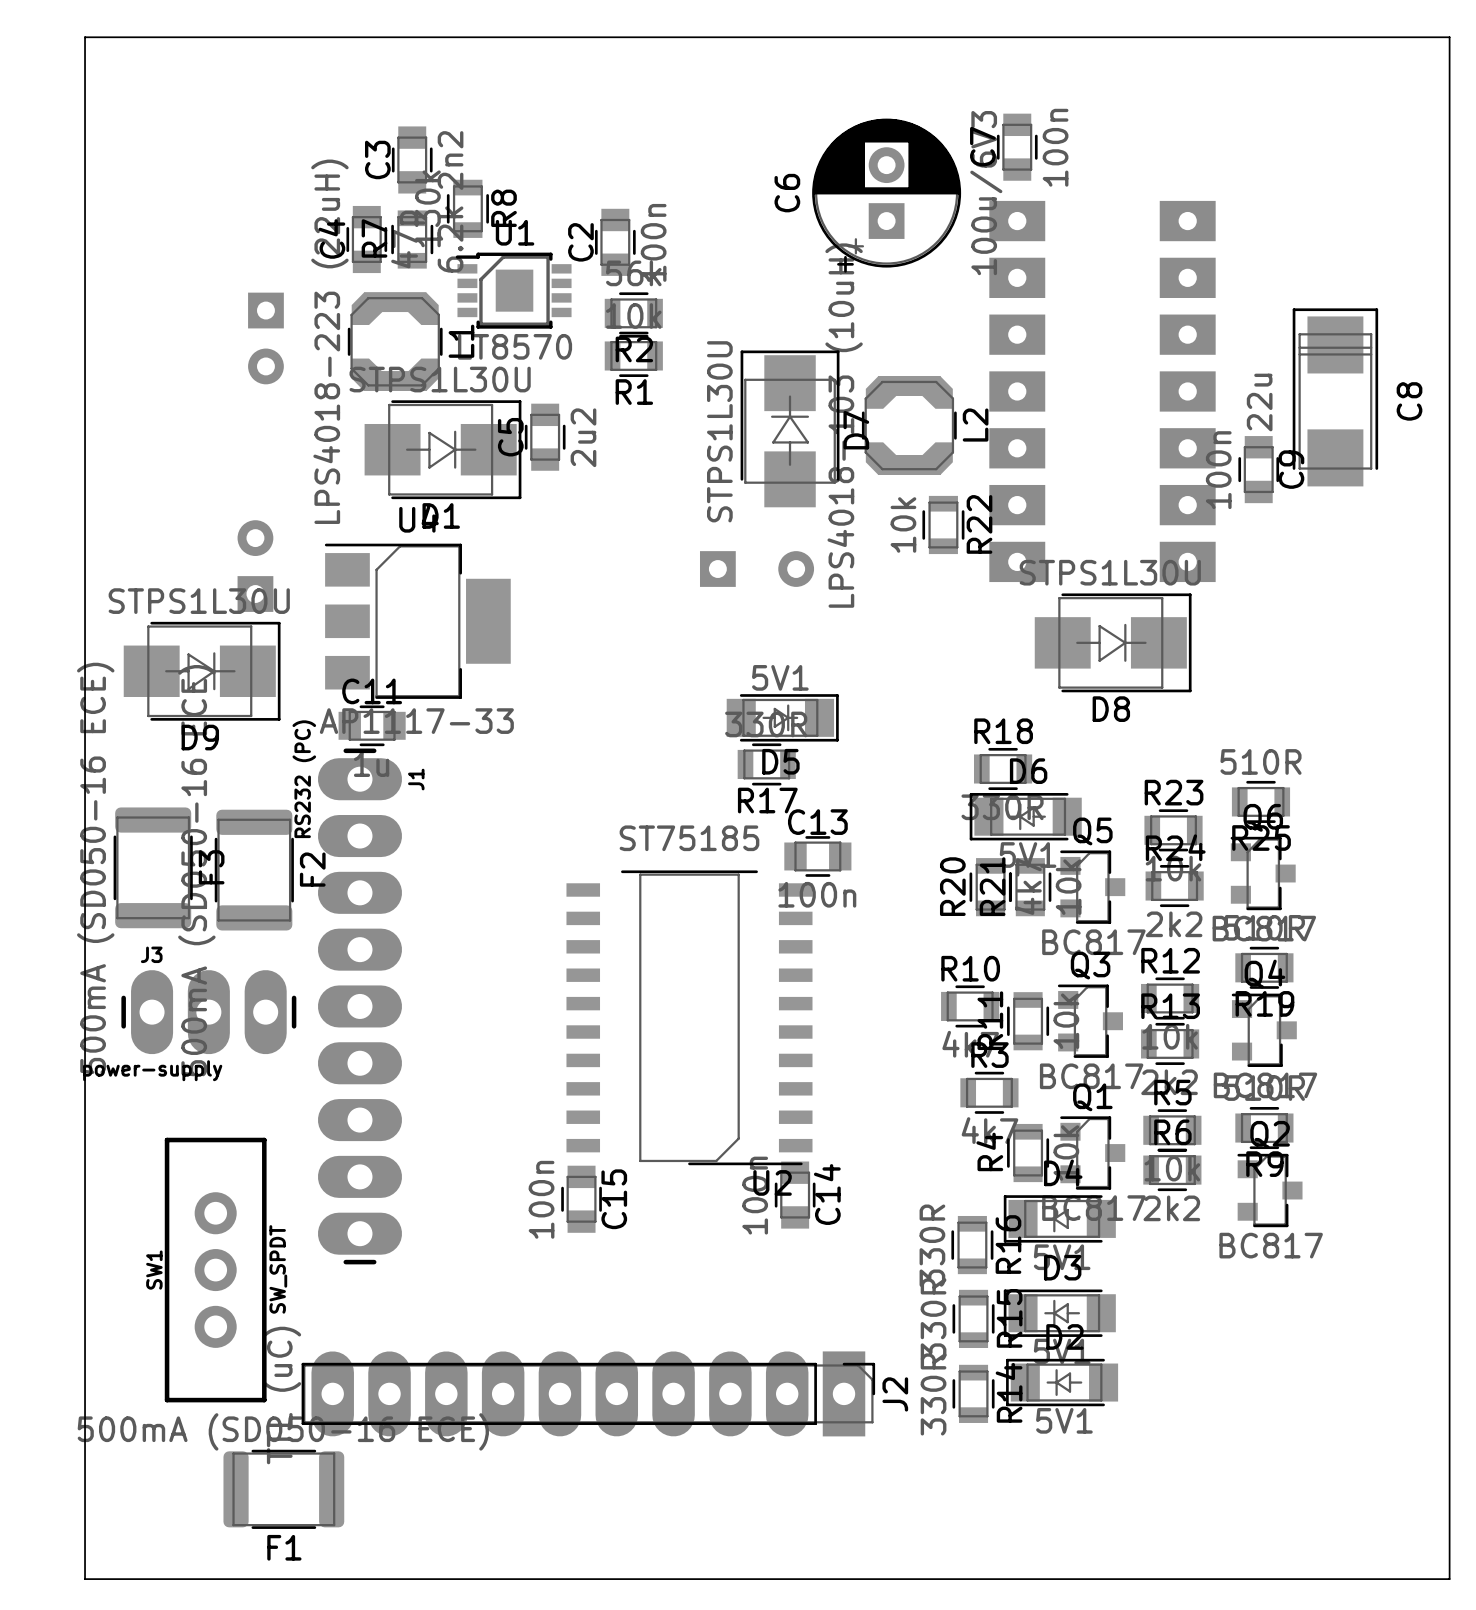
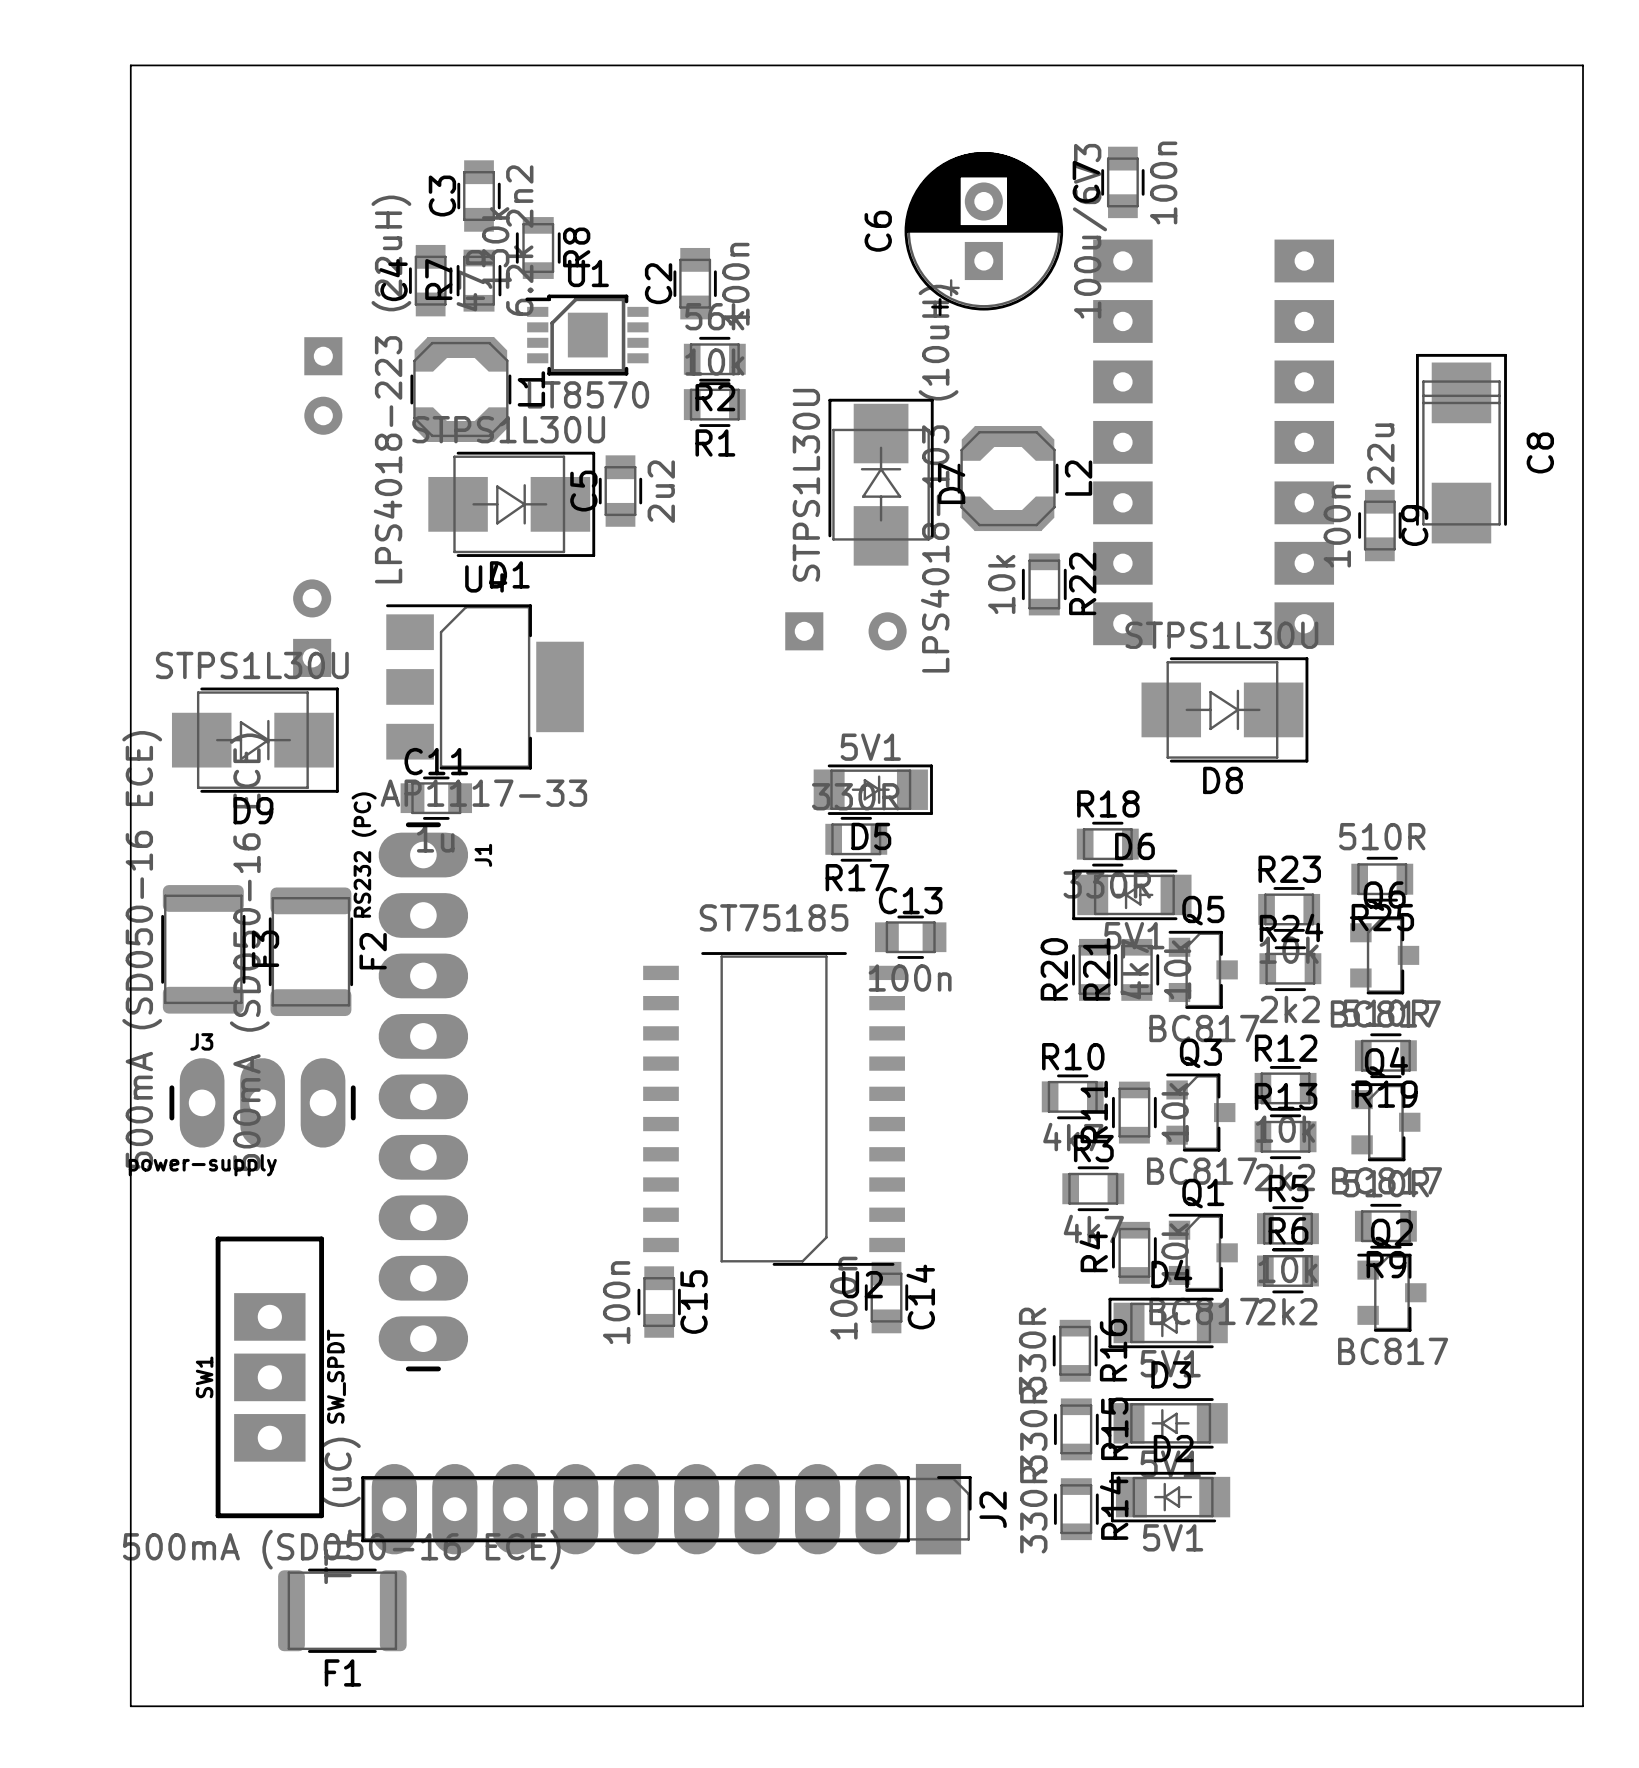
SW1 footprint: [164, 1137, 267, 1403] -> [215, 1236, 325, 1519]

